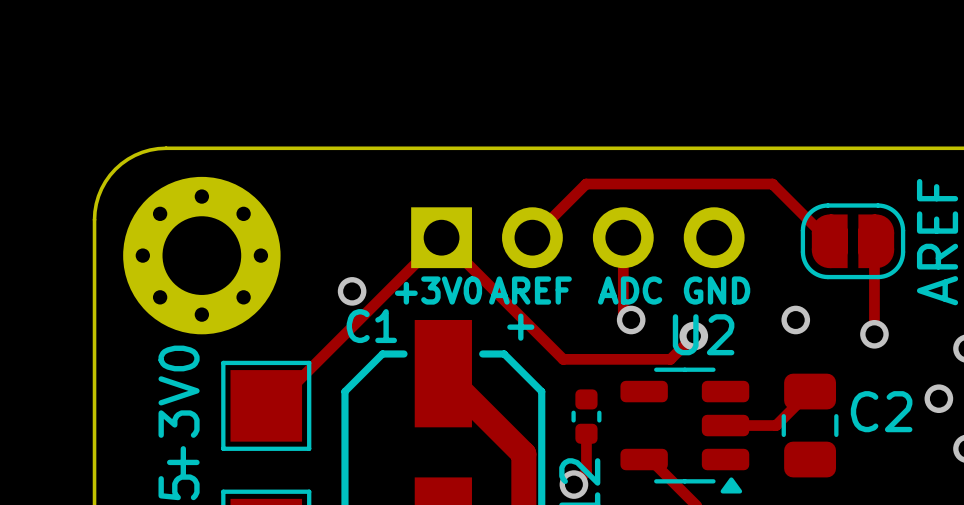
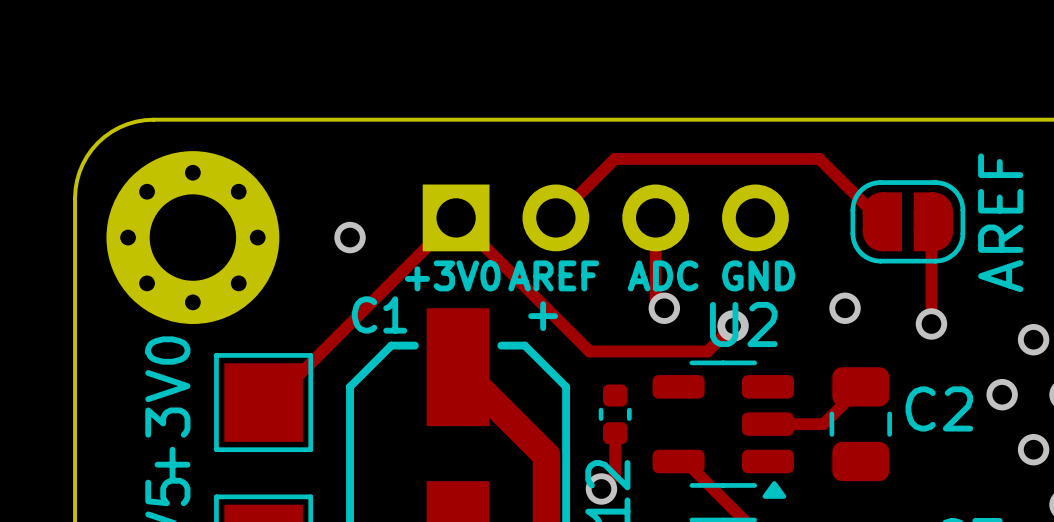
via position: (352, 291) -> (350, 237)

